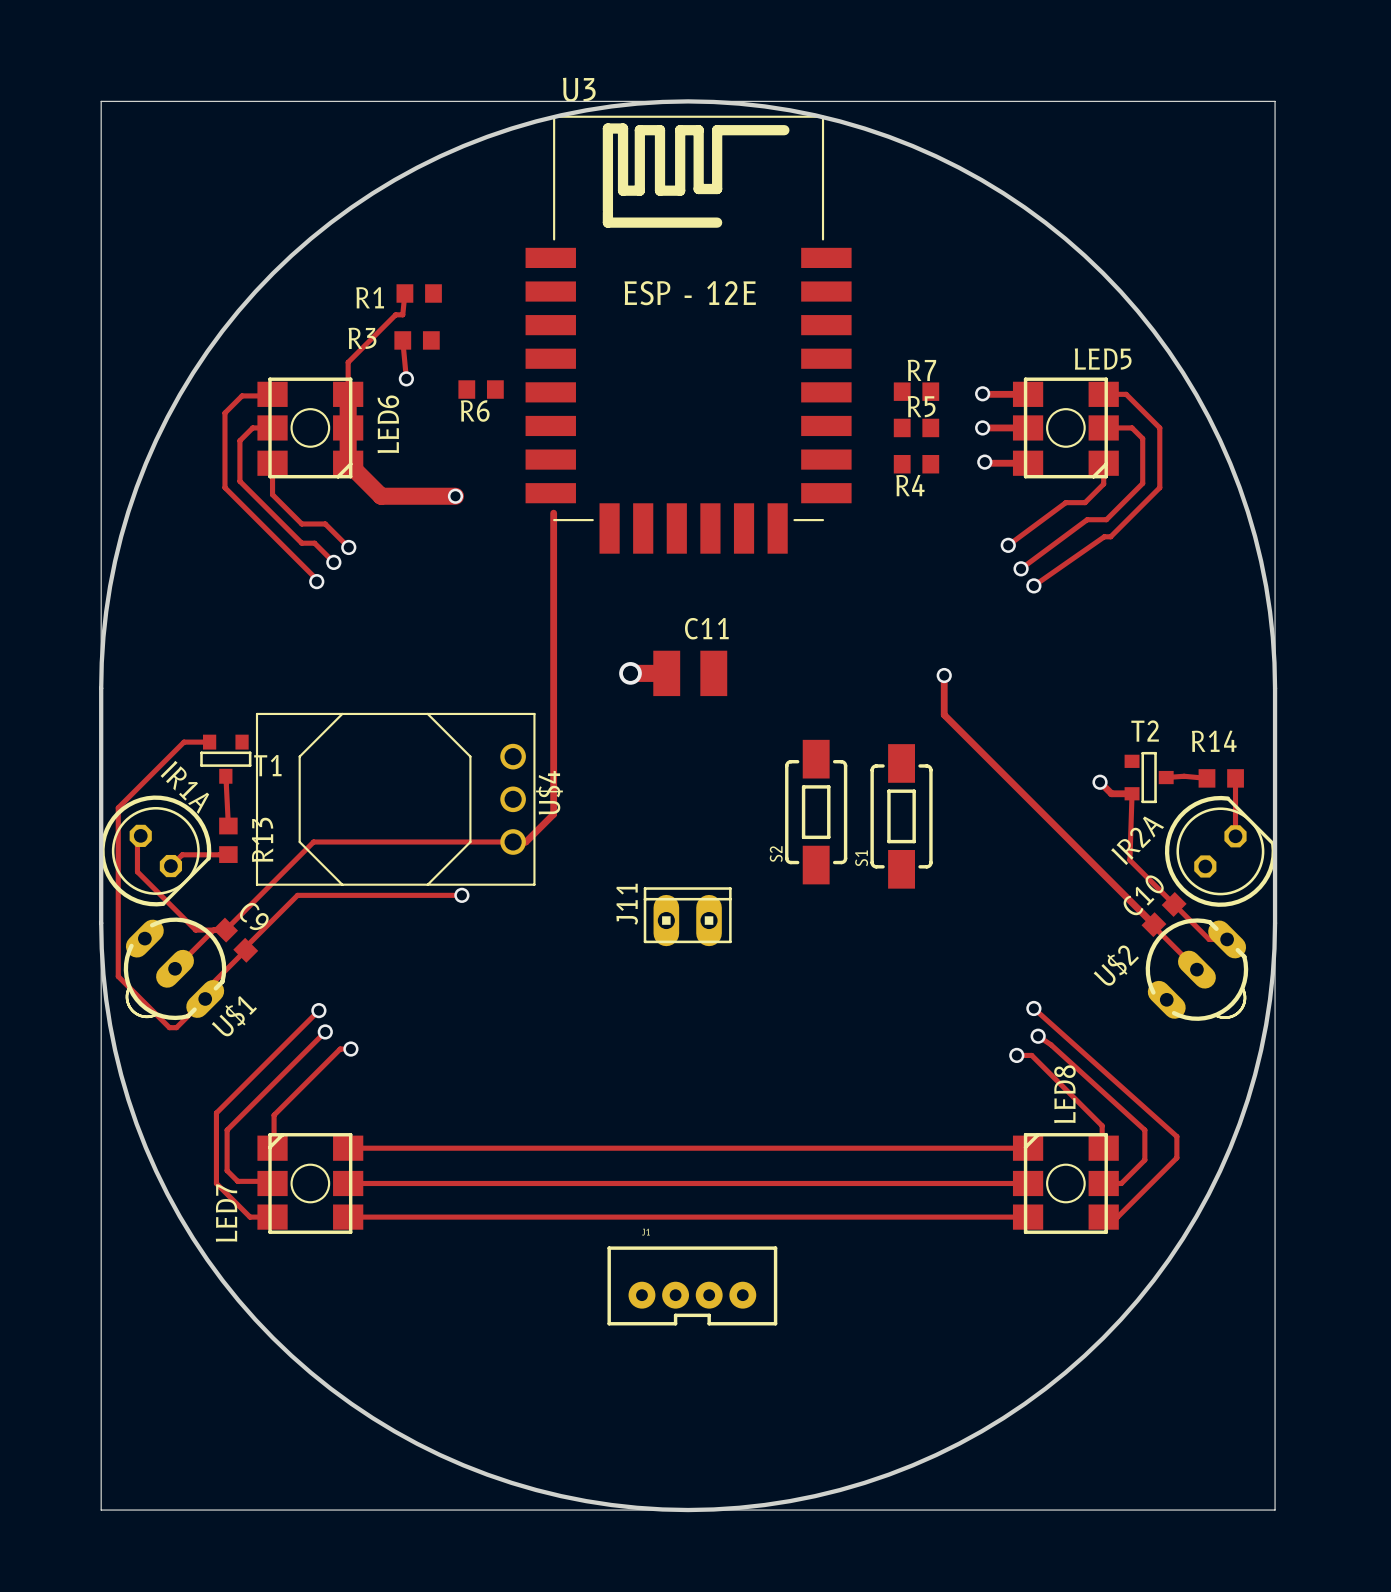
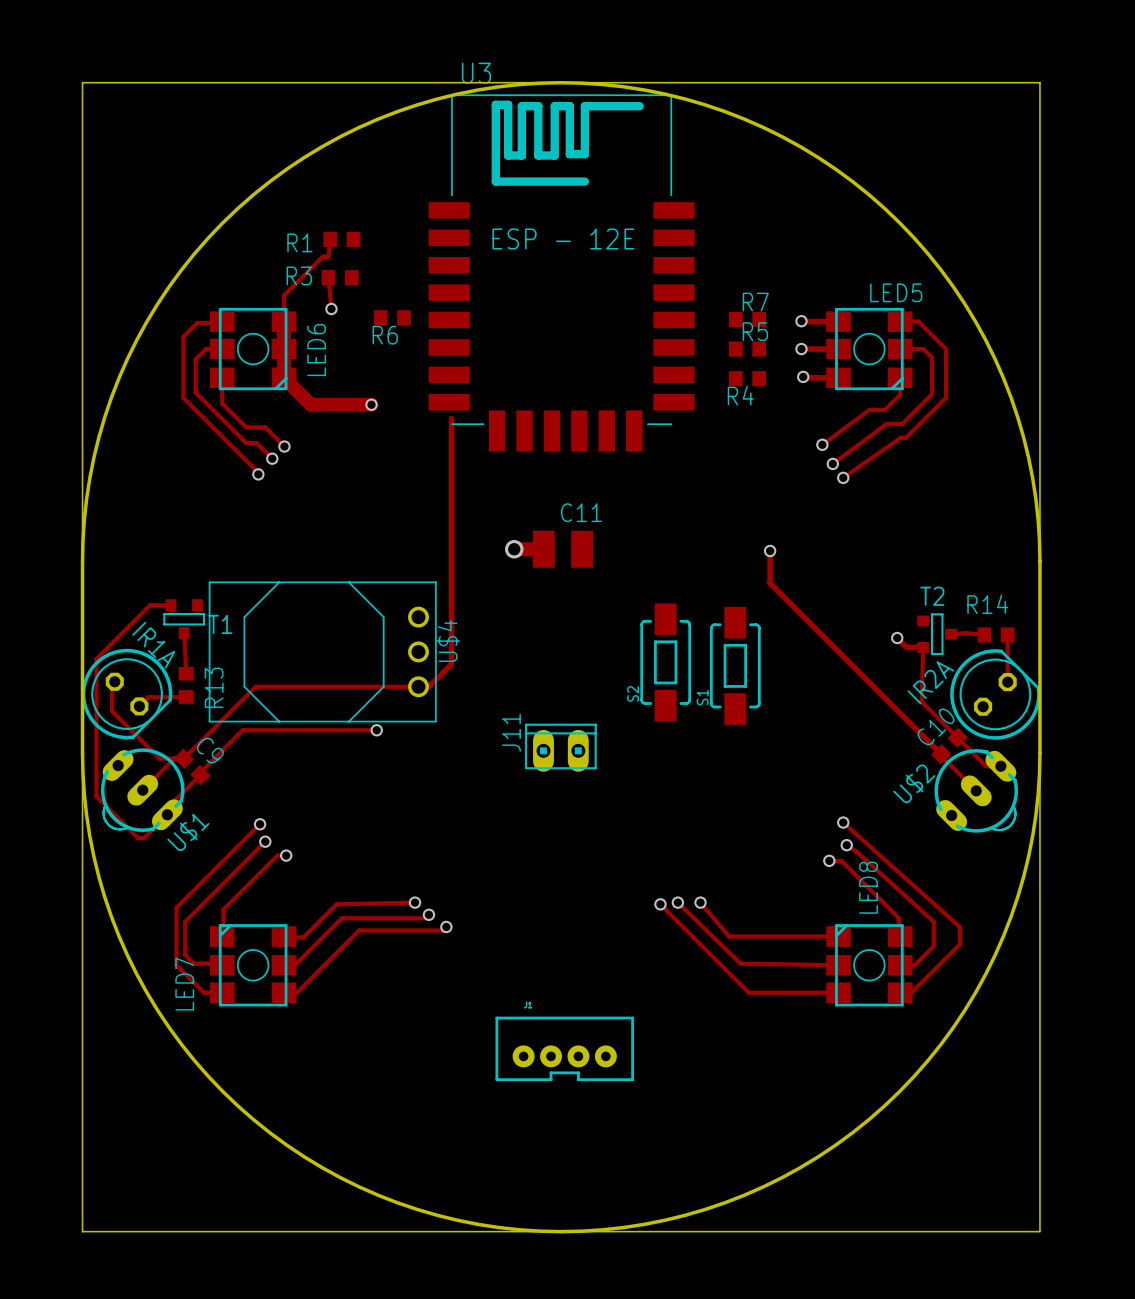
via: none -> (415, 902)
via: none -> (677, 902)
track: none -> (700, 902) (729, 936)
via: none -> (700, 902)
track: none -> (660, 904) (748, 992)
via: none -> (660, 904)
track: none -> (428, 914) (425, 918) (341, 918) (294, 965)
via: none -> (428, 914)
via: none -> (446, 926)
track: (348, 1148) (894, 1148) -> (283, 936) (303, 937) (336, 904) (415, 902)
track: (361, 1183) (1028, 1183) -> (677, 902) (740, 963) (838, 965)
track: (364, 1217) (918, 1217) -> (297, 992) (359, 930) (442, 930) (446, 926)

